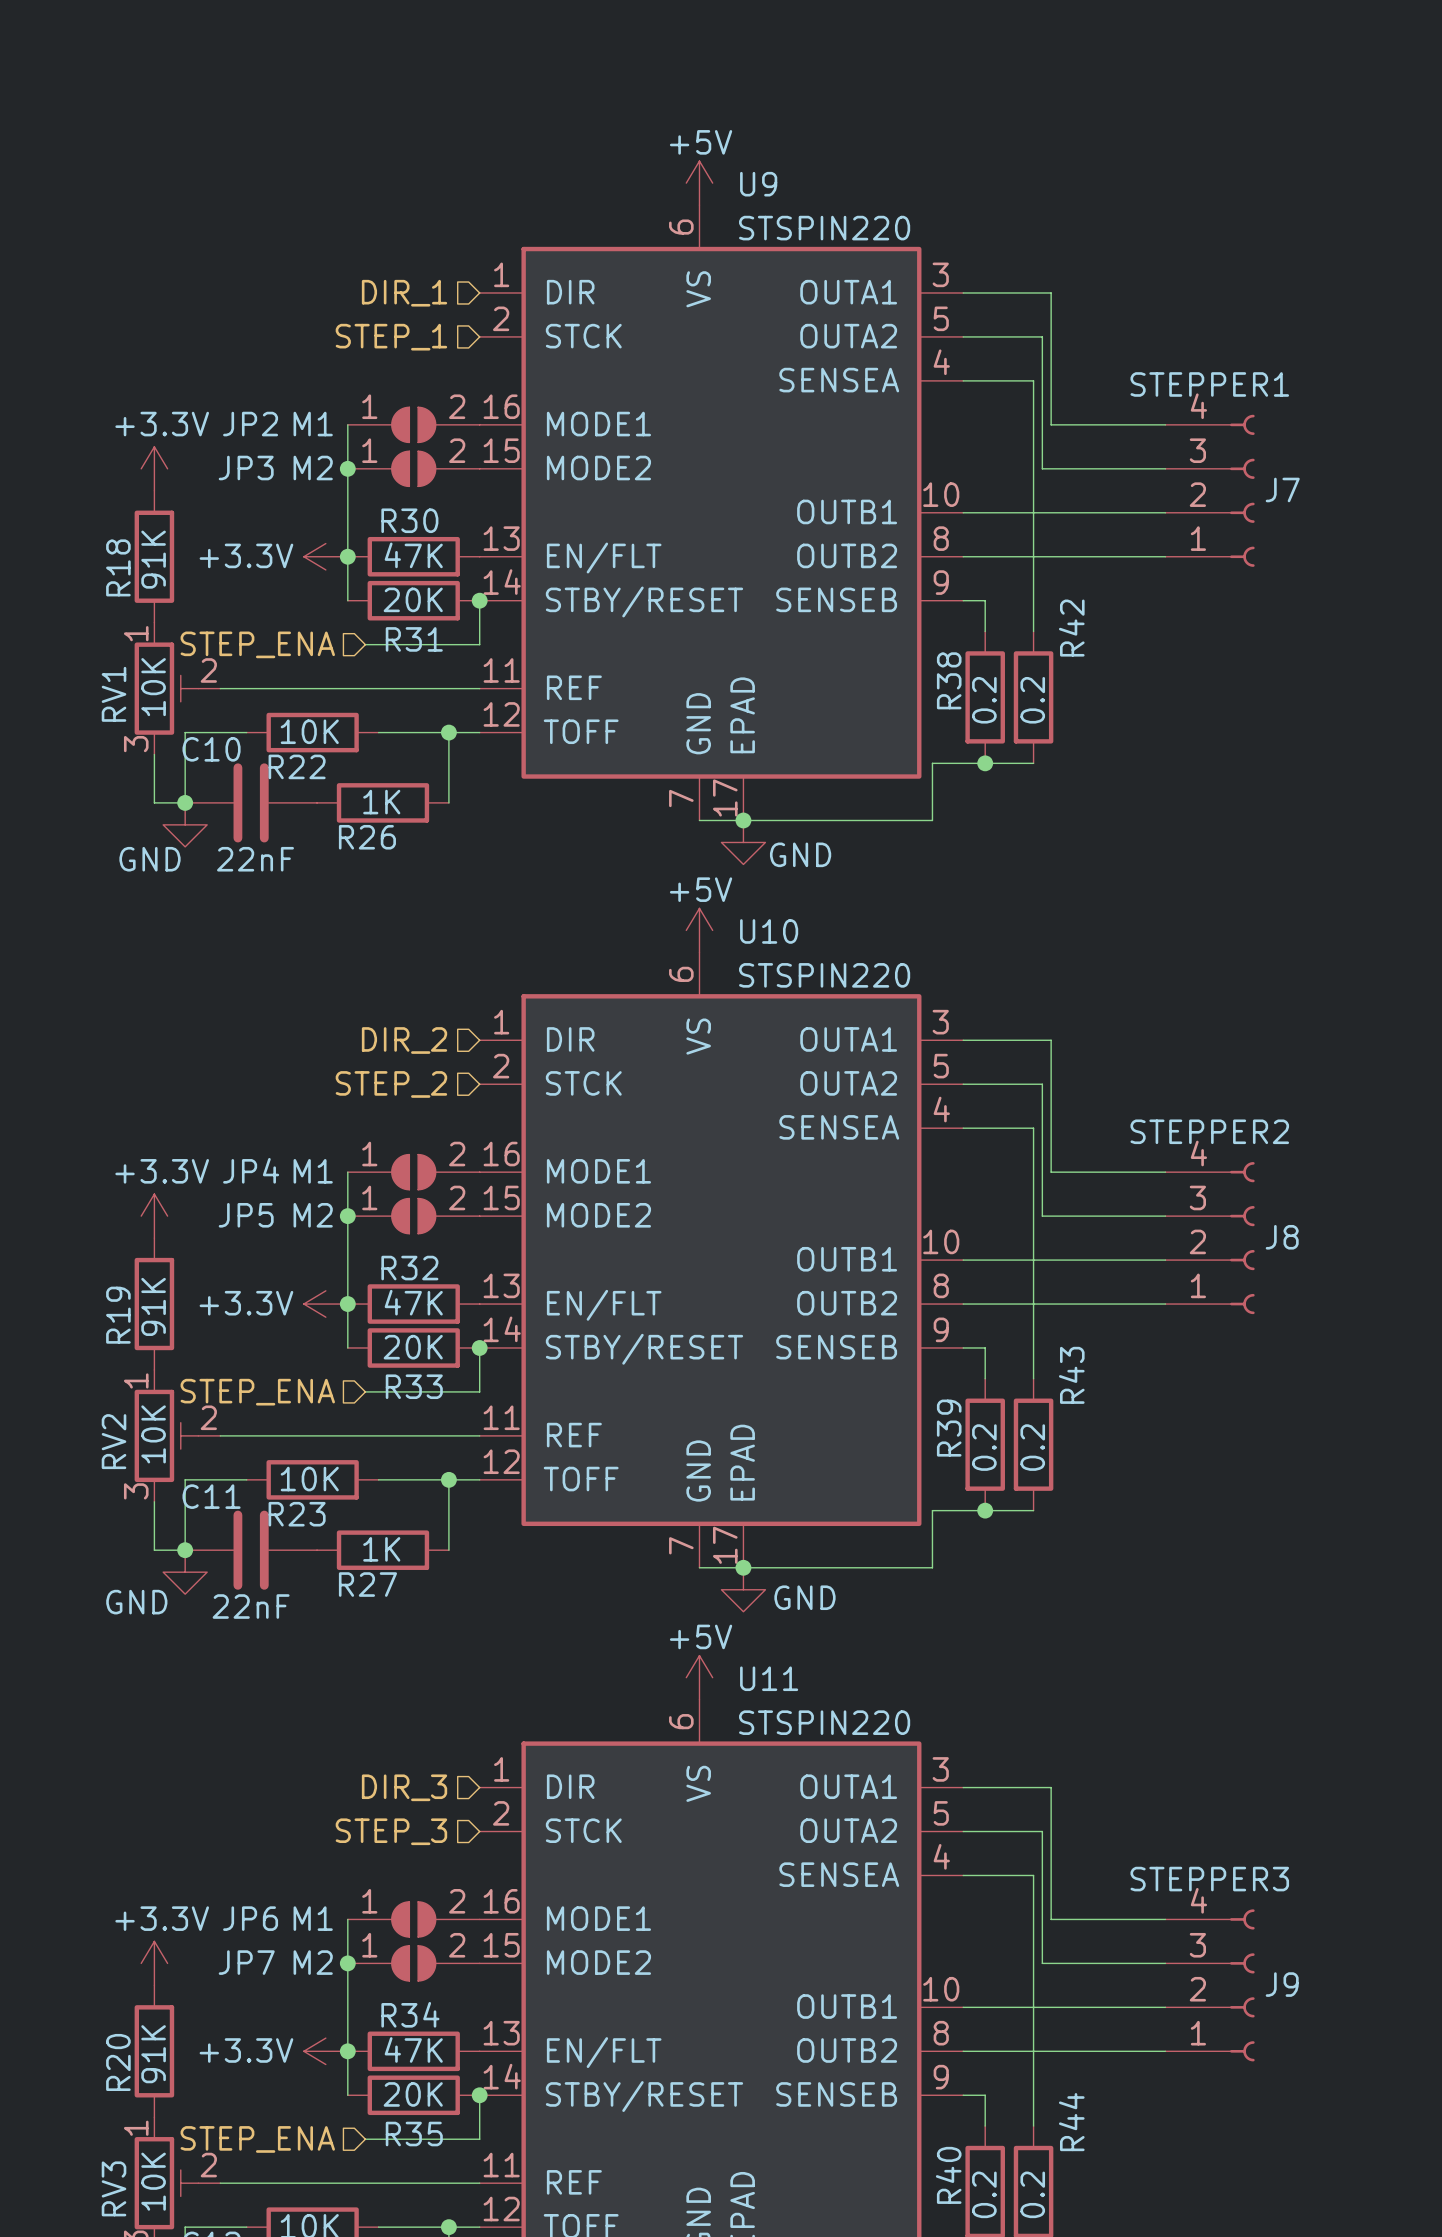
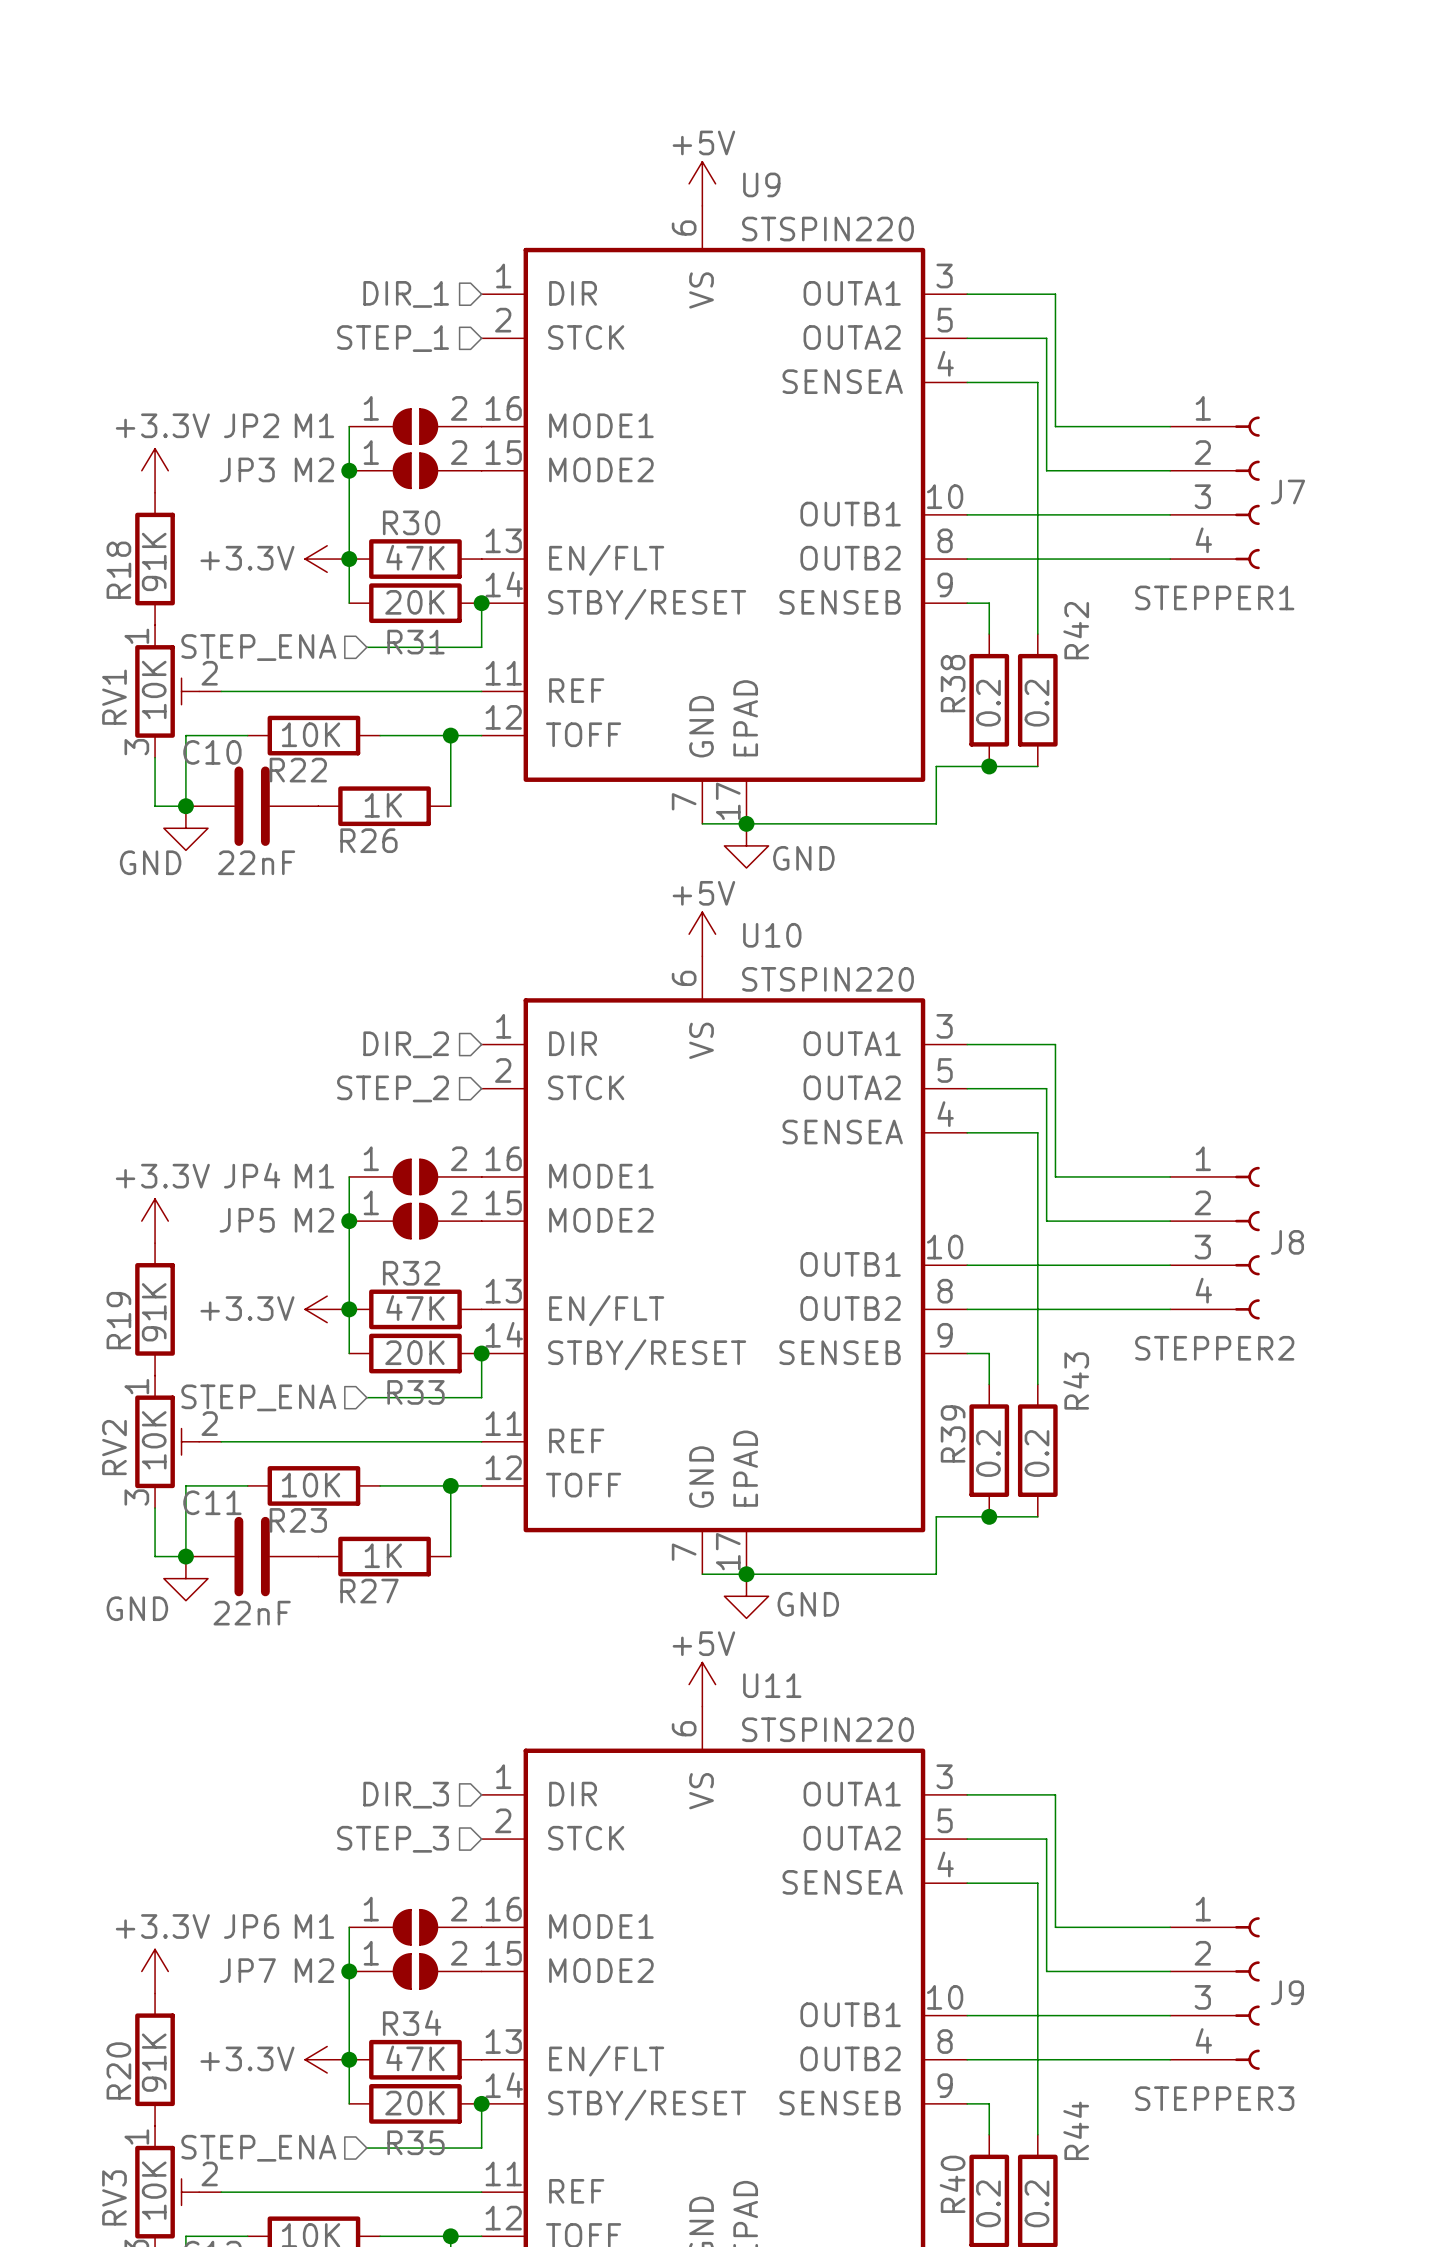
J7 flip: as is (1242, 490) -> up-down (1247, 492)
J8 flip: as is (1242, 1238) -> up-down (1247, 1243)
J9 flip: as is (1242, 1985) -> up-down (1247, 1993)

